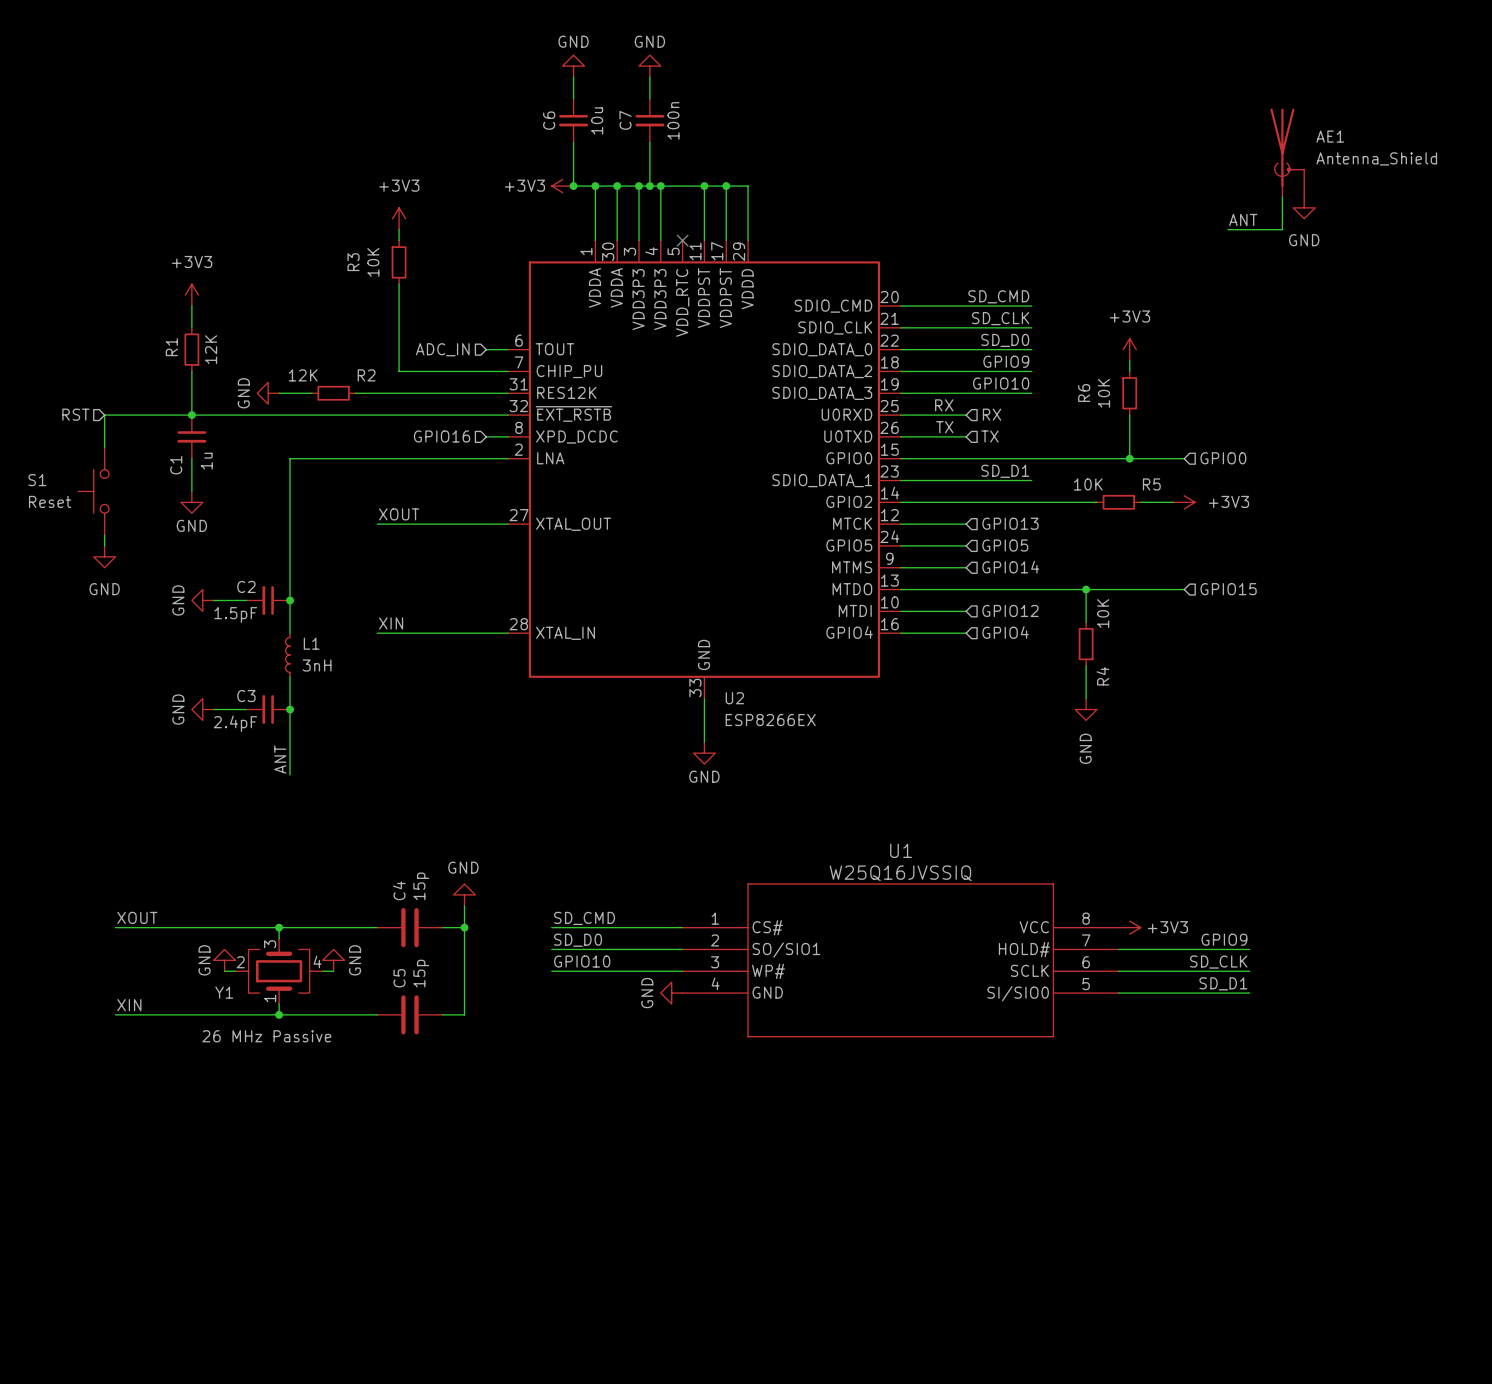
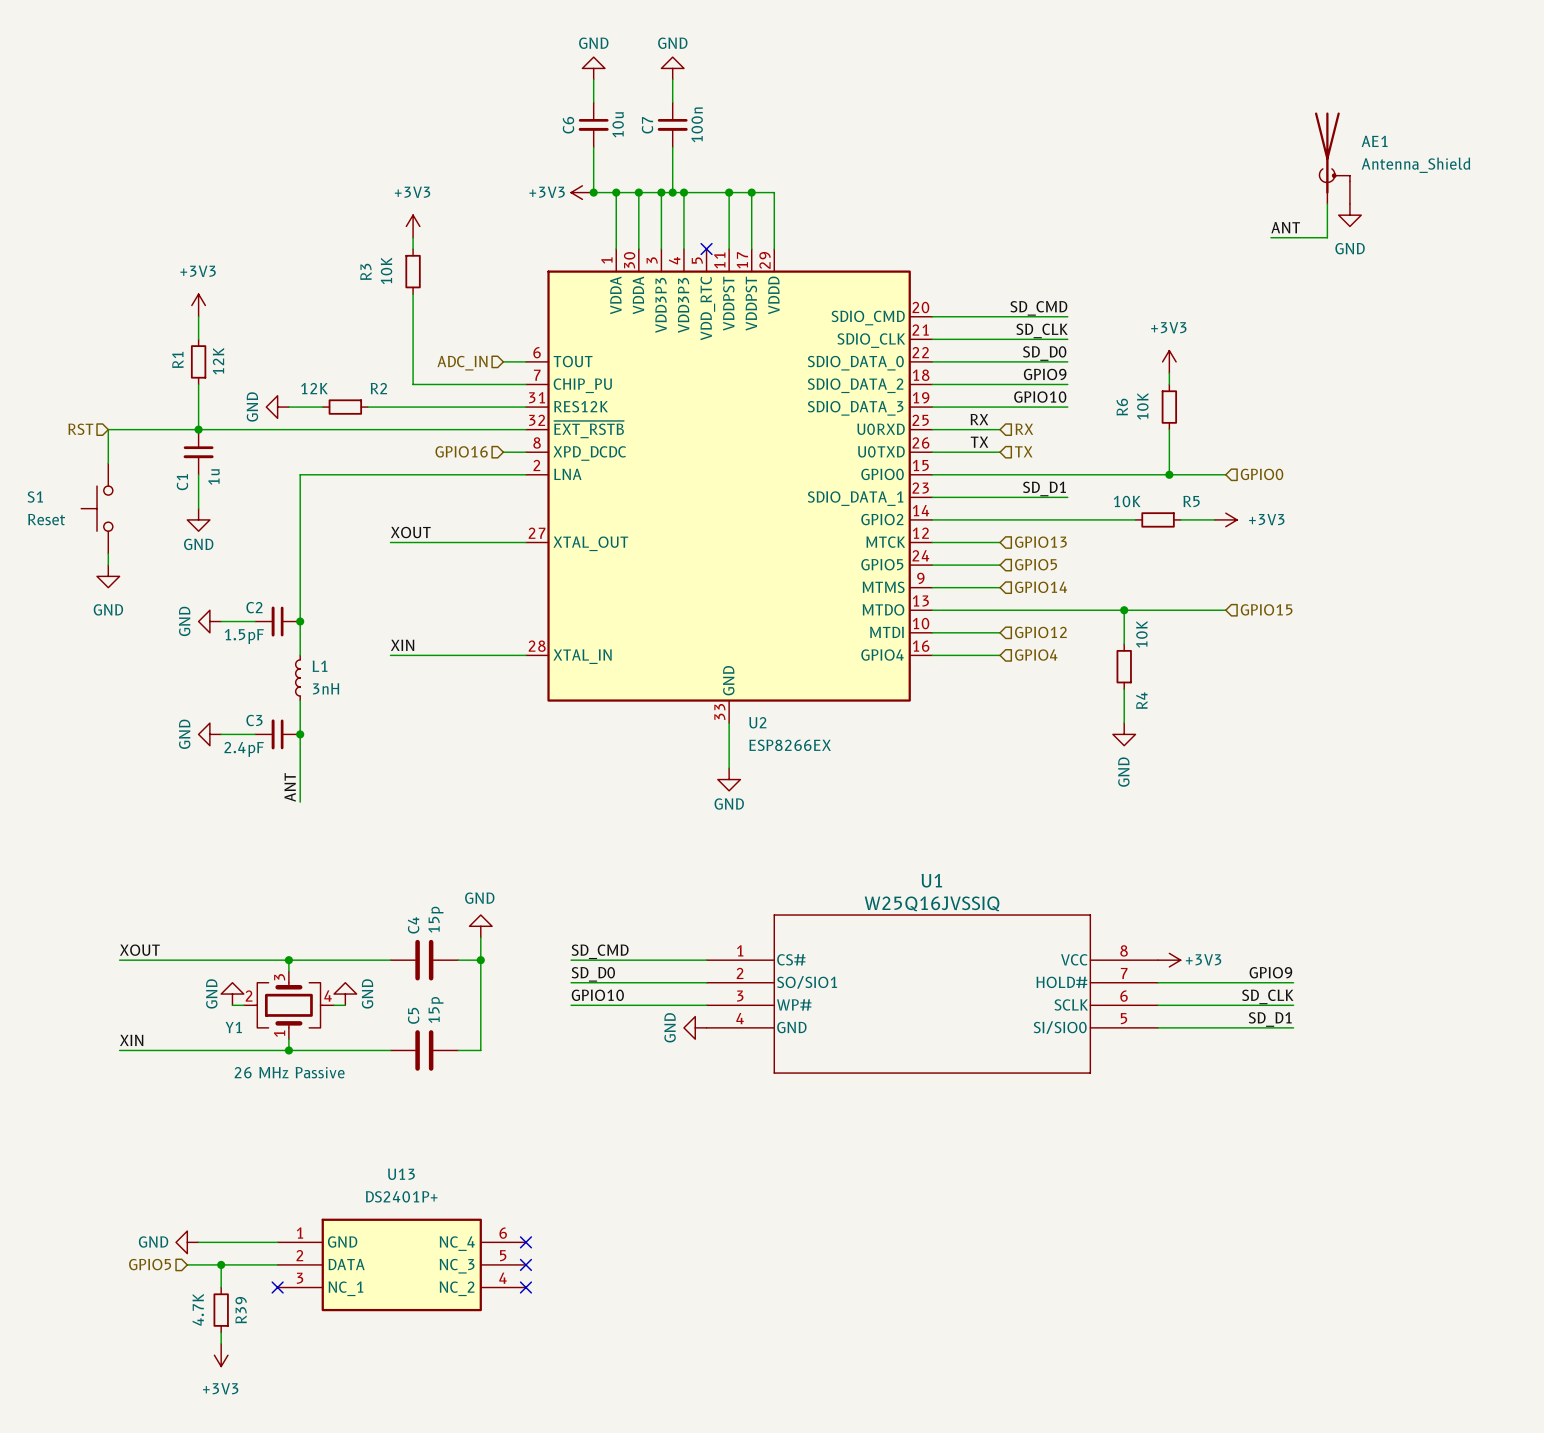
power symbol: none -> GND (187, 1242)
wire: none -> (198, 1242) (277, 1242)
no-connect mark: none -> (525, 1242)
hierarchical label: none -> GPIO5 (150, 1264)
wire: none -> (187, 1264) (277, 1264)
wire: none -> (221, 1264) (221, 1287)
junction: none -> (221, 1264)
U13: none -> DS2401P+ (401, 1264)
no-connect mark: none -> (525, 1264)
no-connect mark: none -> (277, 1287)
no-connect mark: none -> (525, 1287)
R39: none -> 4.7K (221, 1310)
wire: none -> (221, 1332) (221, 1343)
power symbol: none -> +3V3 (221, 1355)

